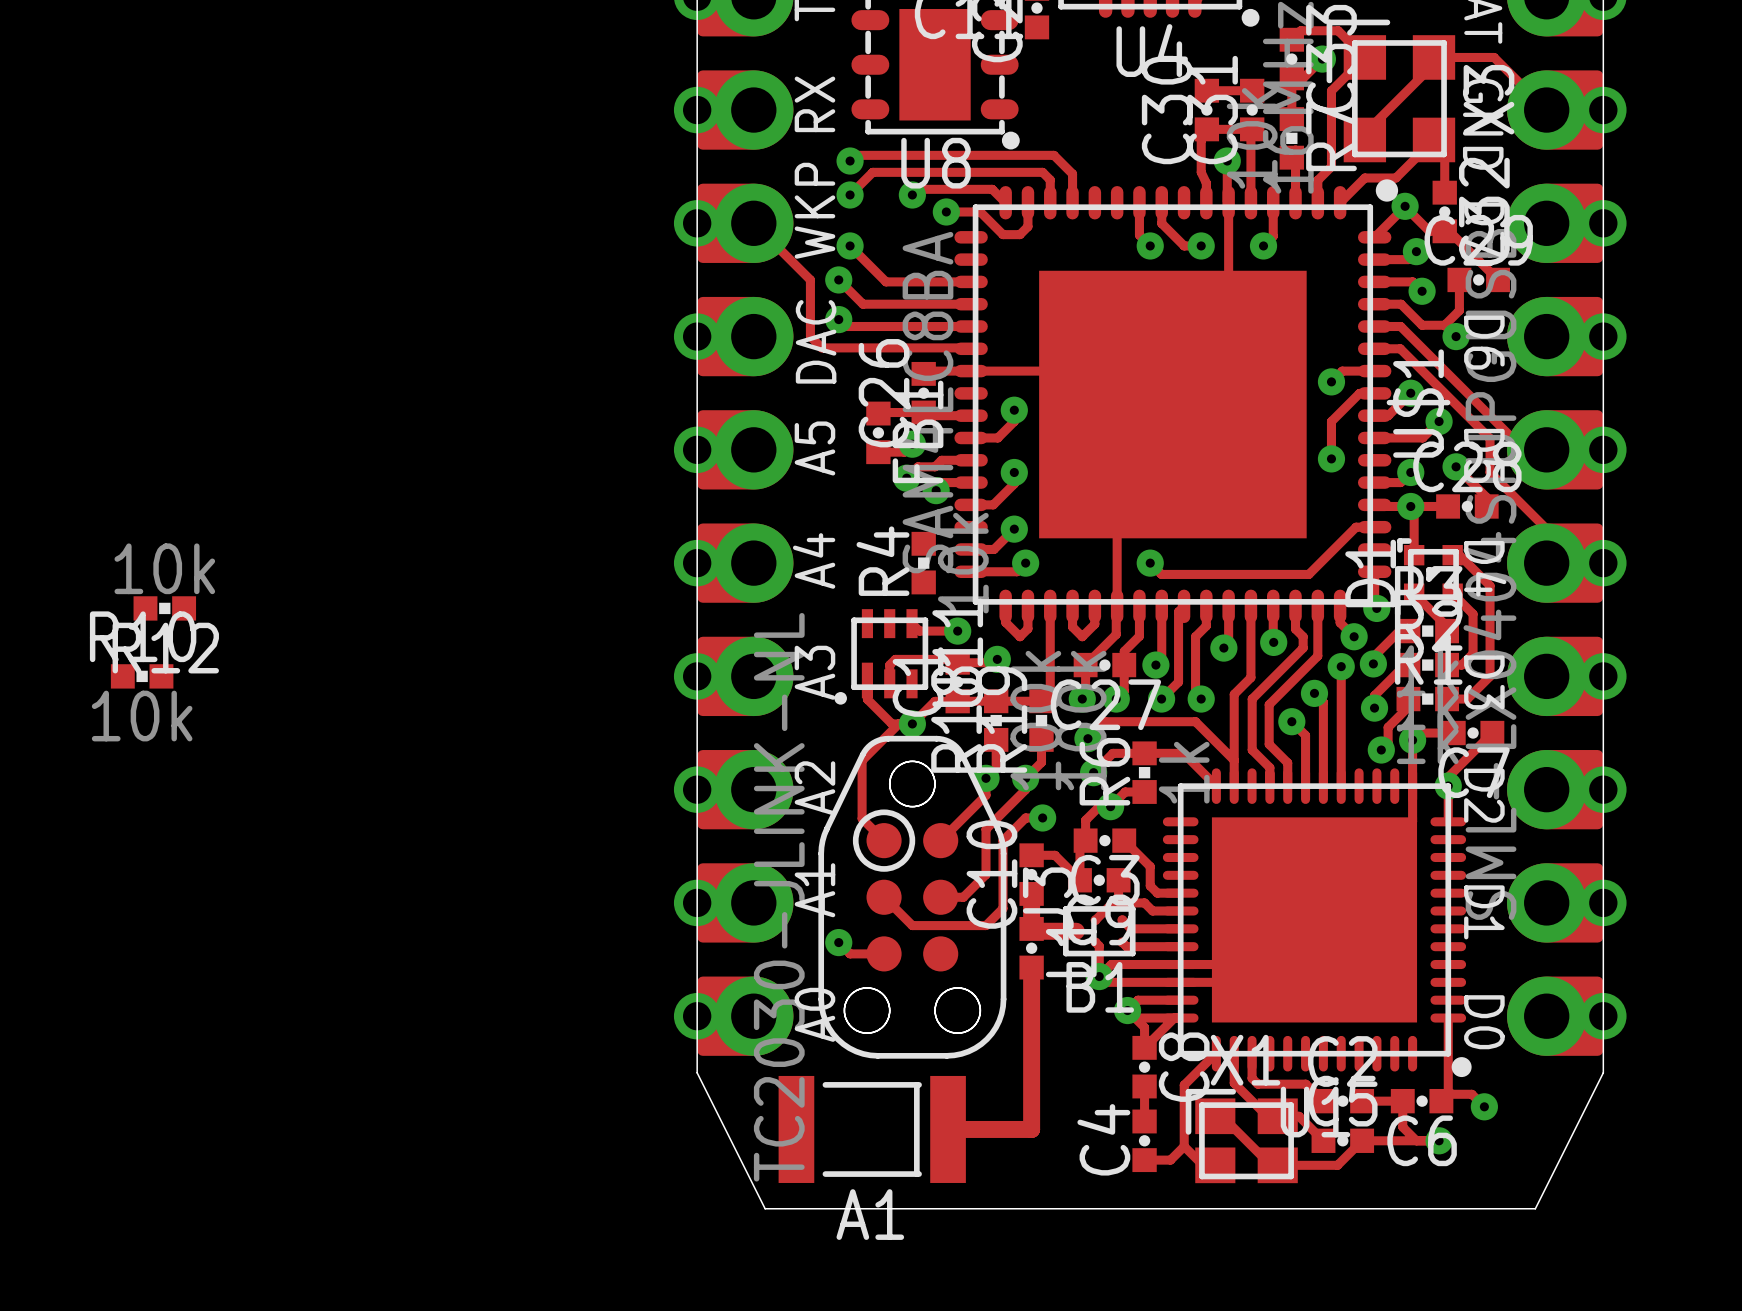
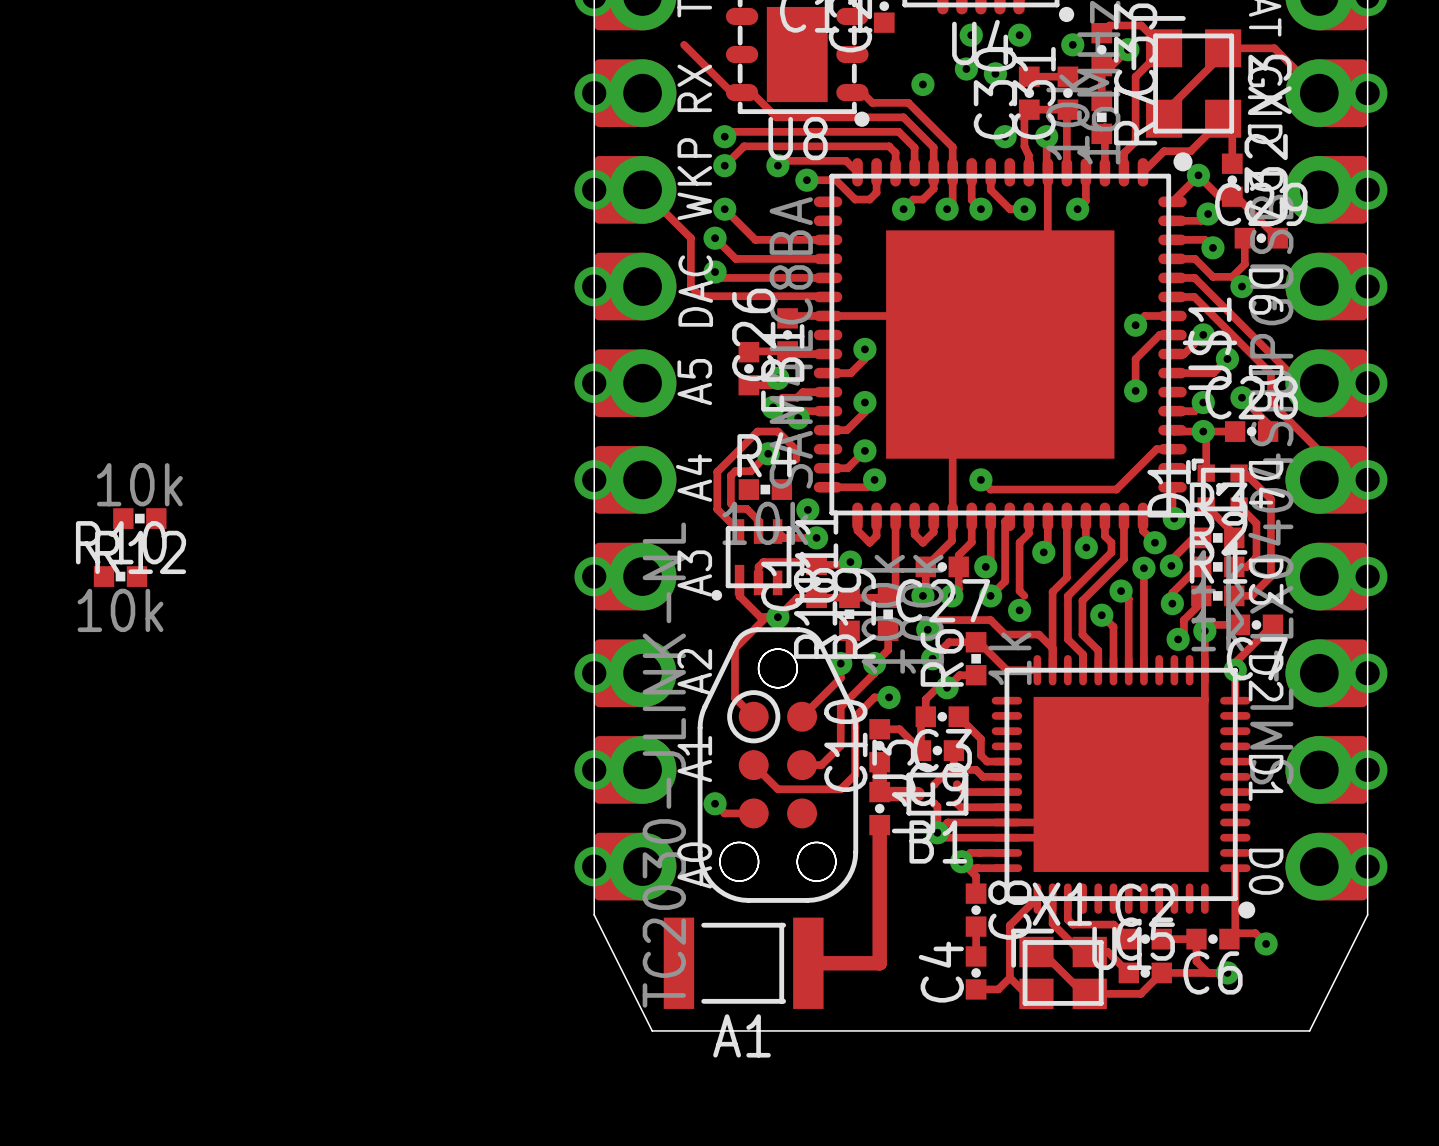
via: none -> (971, 35)
via: none -> (1019, 35)
track: none -> (684, 44) (731, 92) (751, 92) (776, 117) (903, 117) (933, 147) (933, 188) (922, 199) (913, 199) (903, 209)
via: none -> (1072, 44)
via: none -> (966, 69)
via: none -> (995, 73)
via: none -> (922, 84)
track: none -> (862, 92) (872, 102) (908, 102) (952, 147) (952, 203) (947, 209)
via: none -> (1005, 136)
via: none -> (903, 209)
via: none -> (947, 209)
track: none -> (768, 453) (750, 471) (735, 471) (730, 475) (730, 503) (736, 508) (746, 508) (758, 520) (758, 531)
via: none -> (768, 453)
track: none -> (796, 459) (796, 449) (777, 431) (757, 431) (717, 471) (717, 509) (739, 531)
R4 rotation: 0° (923, 563) -> 90° clockwise (765, 489)
via: none -> (807, 509)
via position: (1201, 699) -> (1019, 610)
track: (1099, 727) (1104, 721) (1195, 721) (1218, 744) -> (937, 620) (990, 620) (1005, 634) (1038, 634)
track: (1147, 753) (1183, 753) (1216, 786) -> (978, 642) (1006, 670) (1037, 670)
track: (1174, 1018) (1144, 1047) -> none

